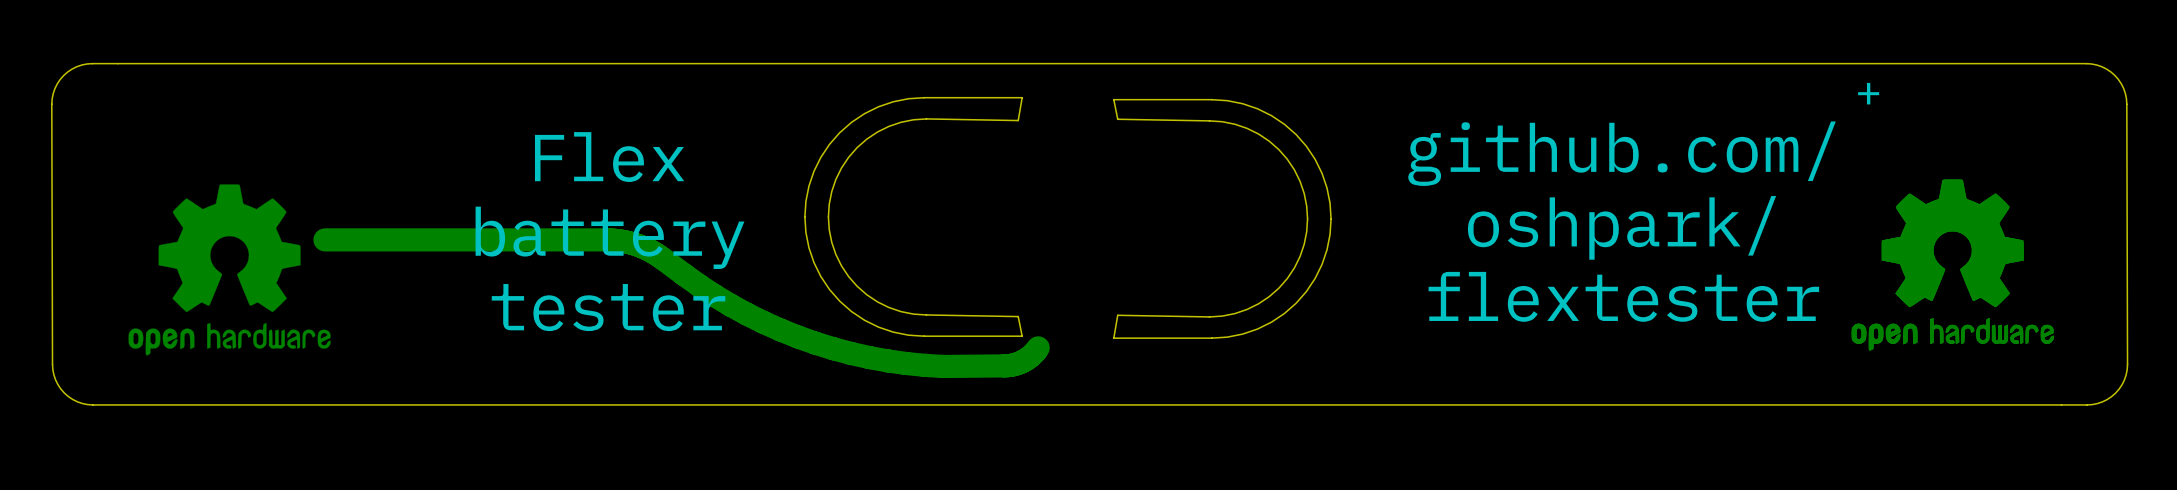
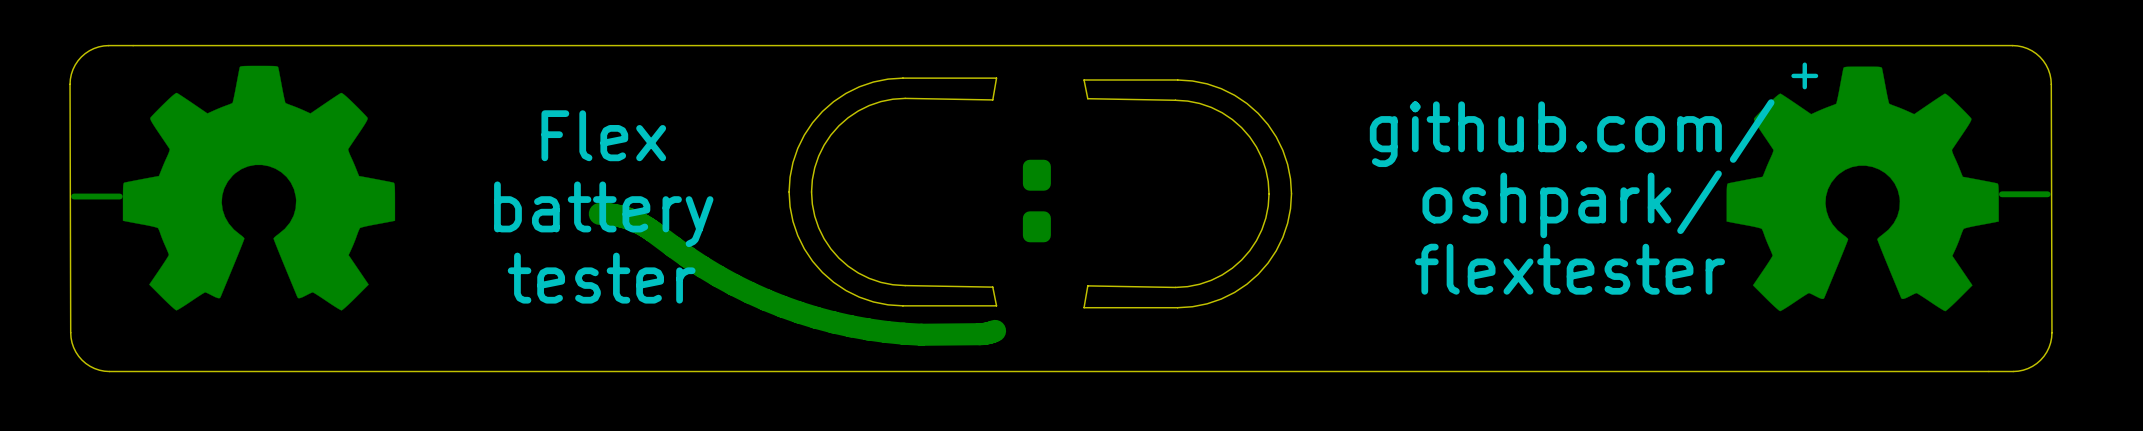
drawing: none -> [122, 65, 396, 311]
drawing: none -> [1726, 66, 1999, 312]
drawing: [1851, 179, 2054, 351] -> none
drawing: [128, 184, 331, 356] -> none
track: none -> (2047, 194) (2001, 194)
track: none -> (119, 196) (74, 196)
part: none -> (1036, 201)
track: (606, 239) (324, 239) -> none
track: (1038, 347) (1031, 355) (1020, 362) -> none

